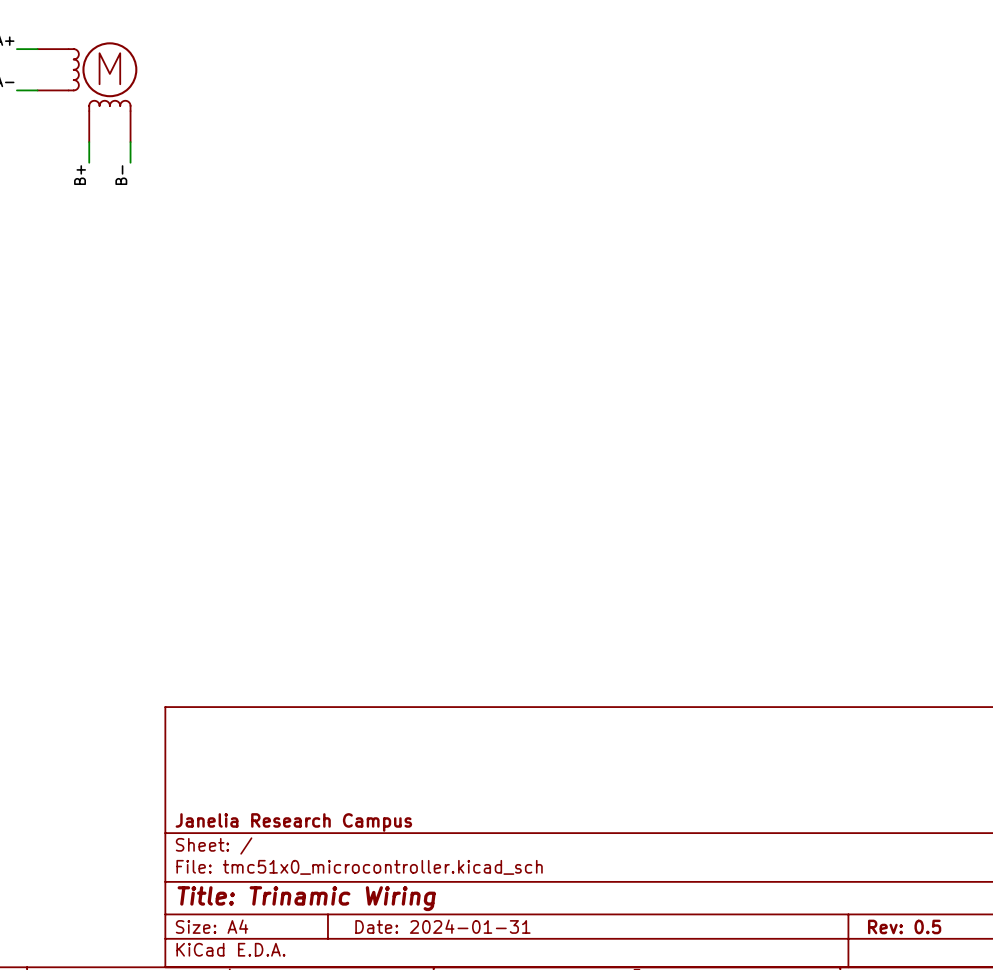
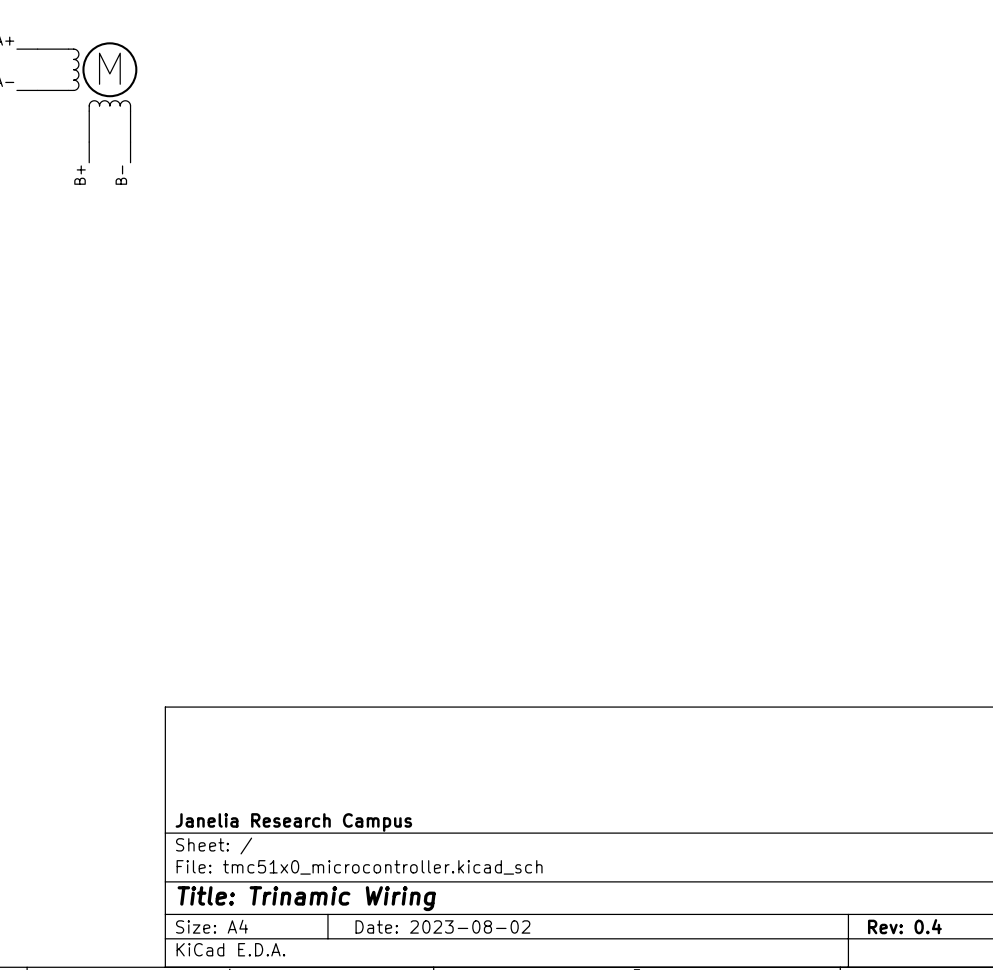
title block: Date: 2024-01-31 (442, 926) -> Date: 2023-08-02 (442, 926)
title block: Rev: 0.5 (904, 926) -> Rev: 0.4 (904, 926)

